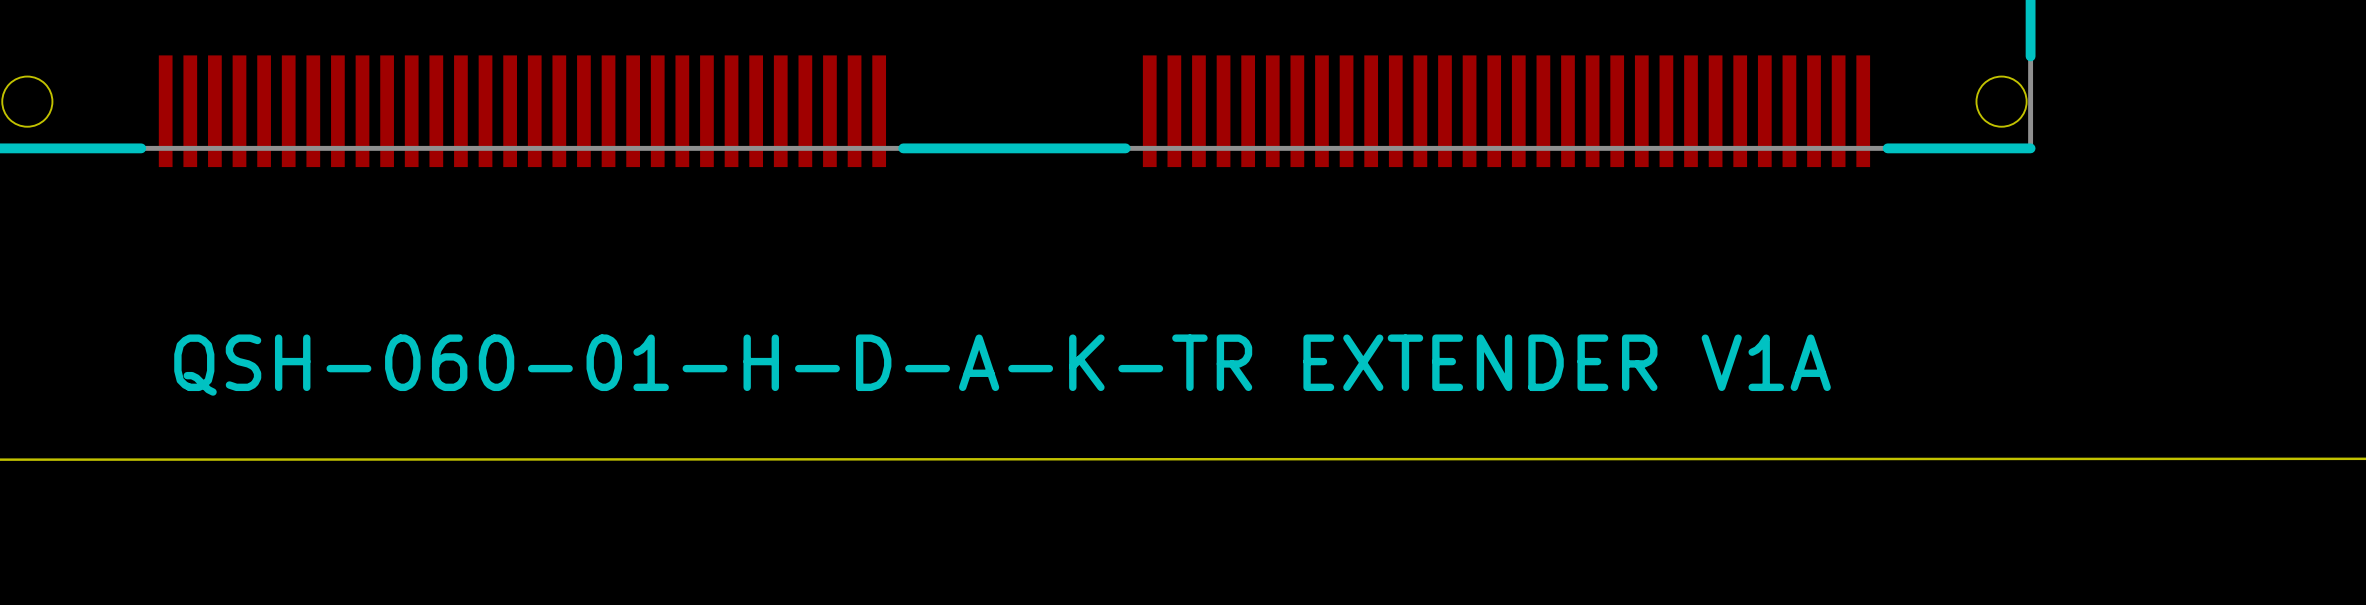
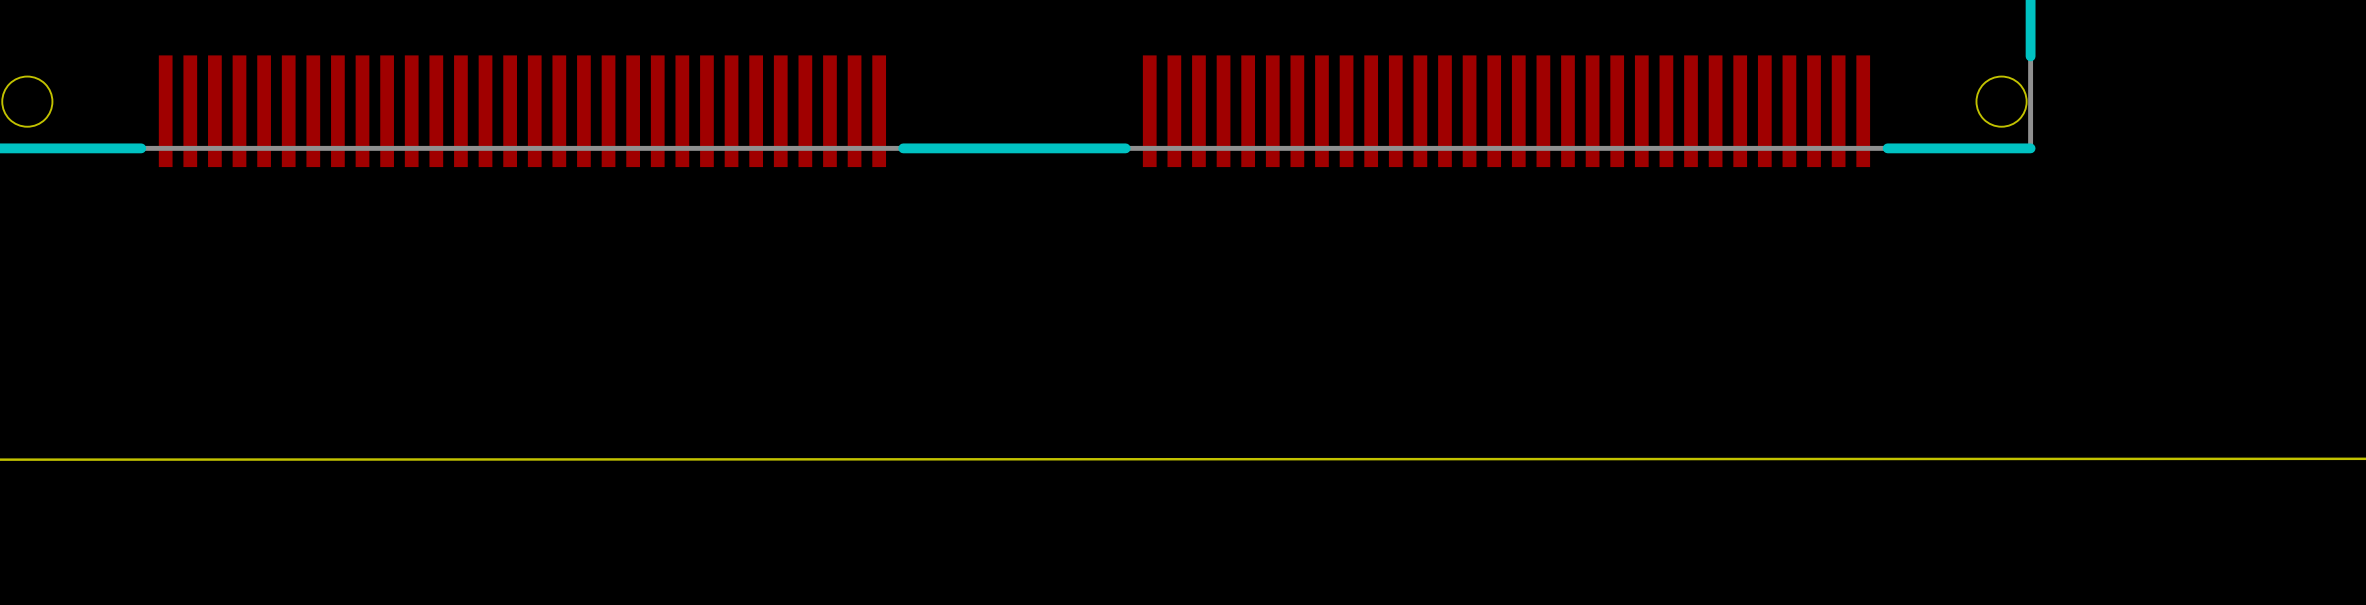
text: QSH-060-01-H-D-A-K-TR EXTENDER V1A (1002, 365) -> none

